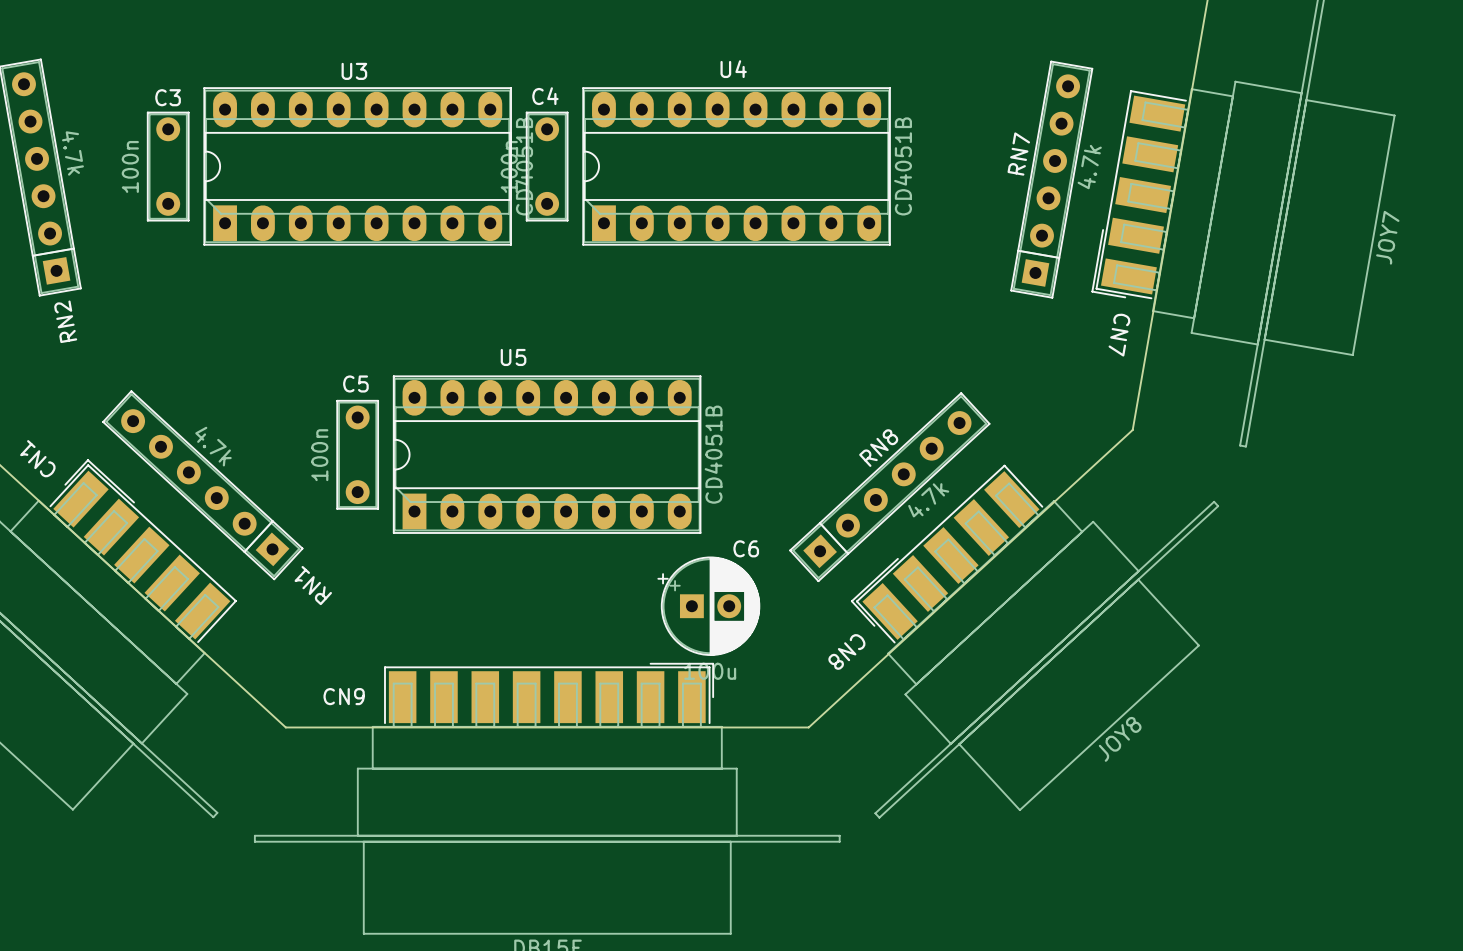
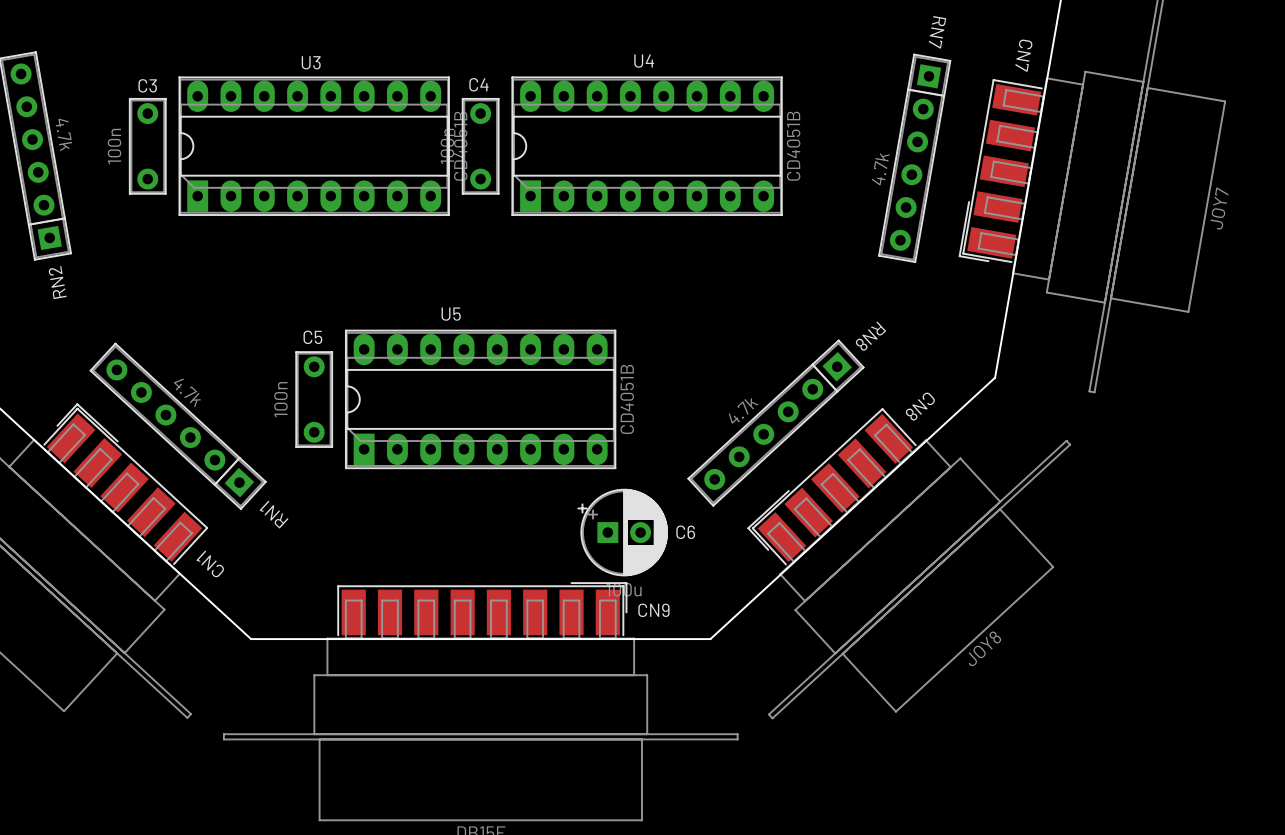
RN7 name position: RN7 (1018, 154) -> RN7 (937, 32)
RN7 rotation: 0° (1051, 179) -> 180° (914, 158)
CN7 name position: CN7 (1119, 335) -> CN7 (1023, 55)
RN8 name position: RN8 (878, 448) -> RN8 (870, 336)
CN1 name position: CN1 (37, 458) -> CN1 (210, 563)
RN8 rotation: 0° (889, 487) -> 180° (775, 423)
C6 name position: C6 (746, 548) -> C6 (685, 532)
CN8 name position: CN8 (846, 651) -> CN8 (920, 406)
CN9 name position: CN9 (344, 696) -> CN9 (653, 610)

